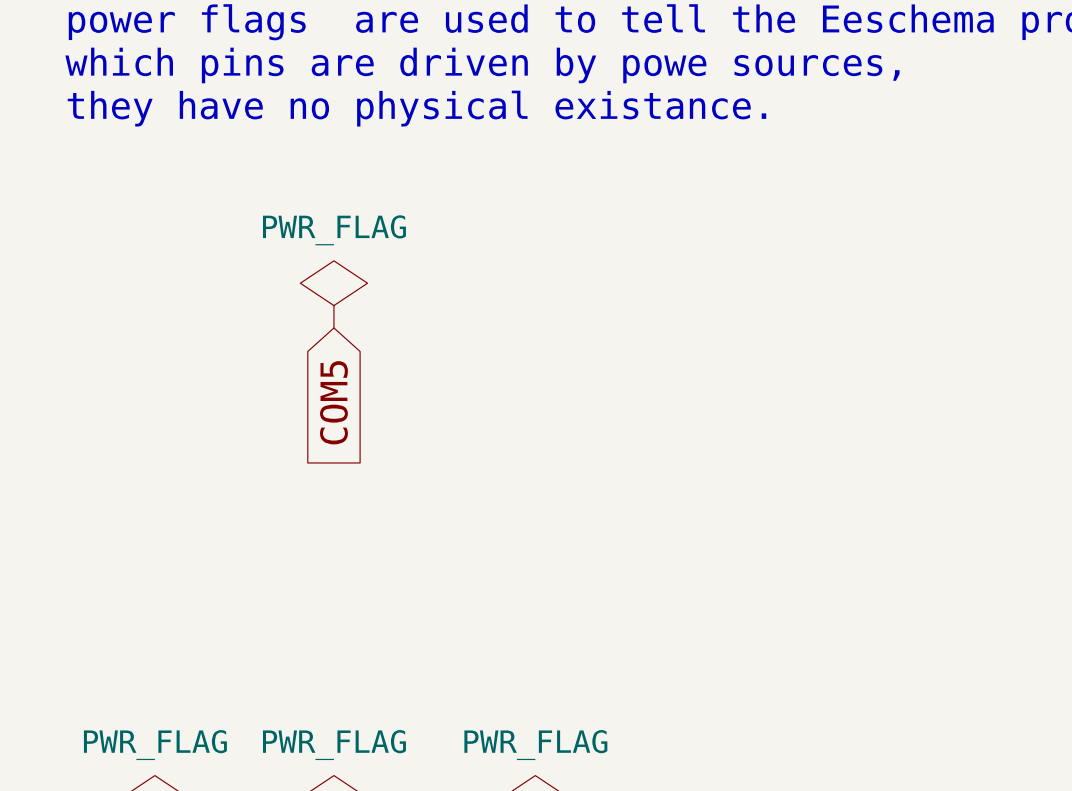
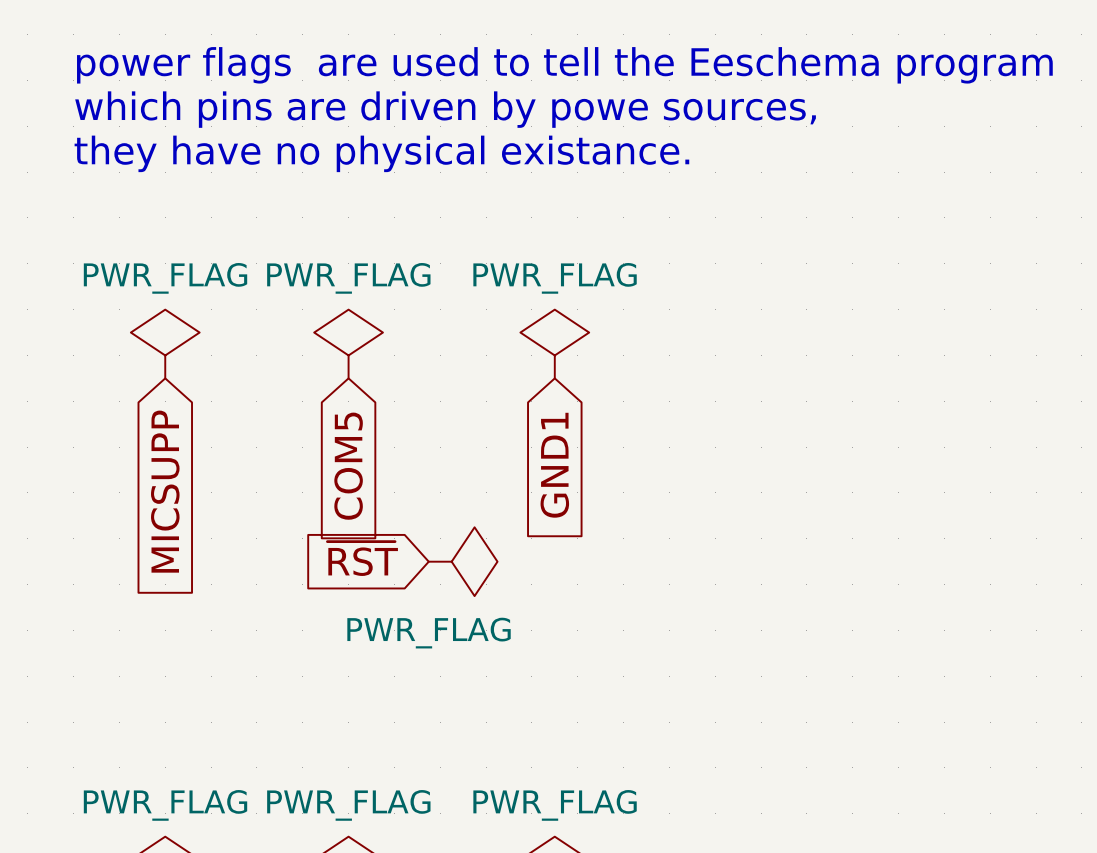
power symbol: none -> PWR_FLAG (165, 344)
power symbol: none -> PWR_FLAG (554, 344)
global label: none -> GND1 (554, 465)
global label: none -> MICSUPP (165, 491)
global label: none -> ~{RST} (362, 558)
power symbol: none -> PWR_FLAG (463, 561)

